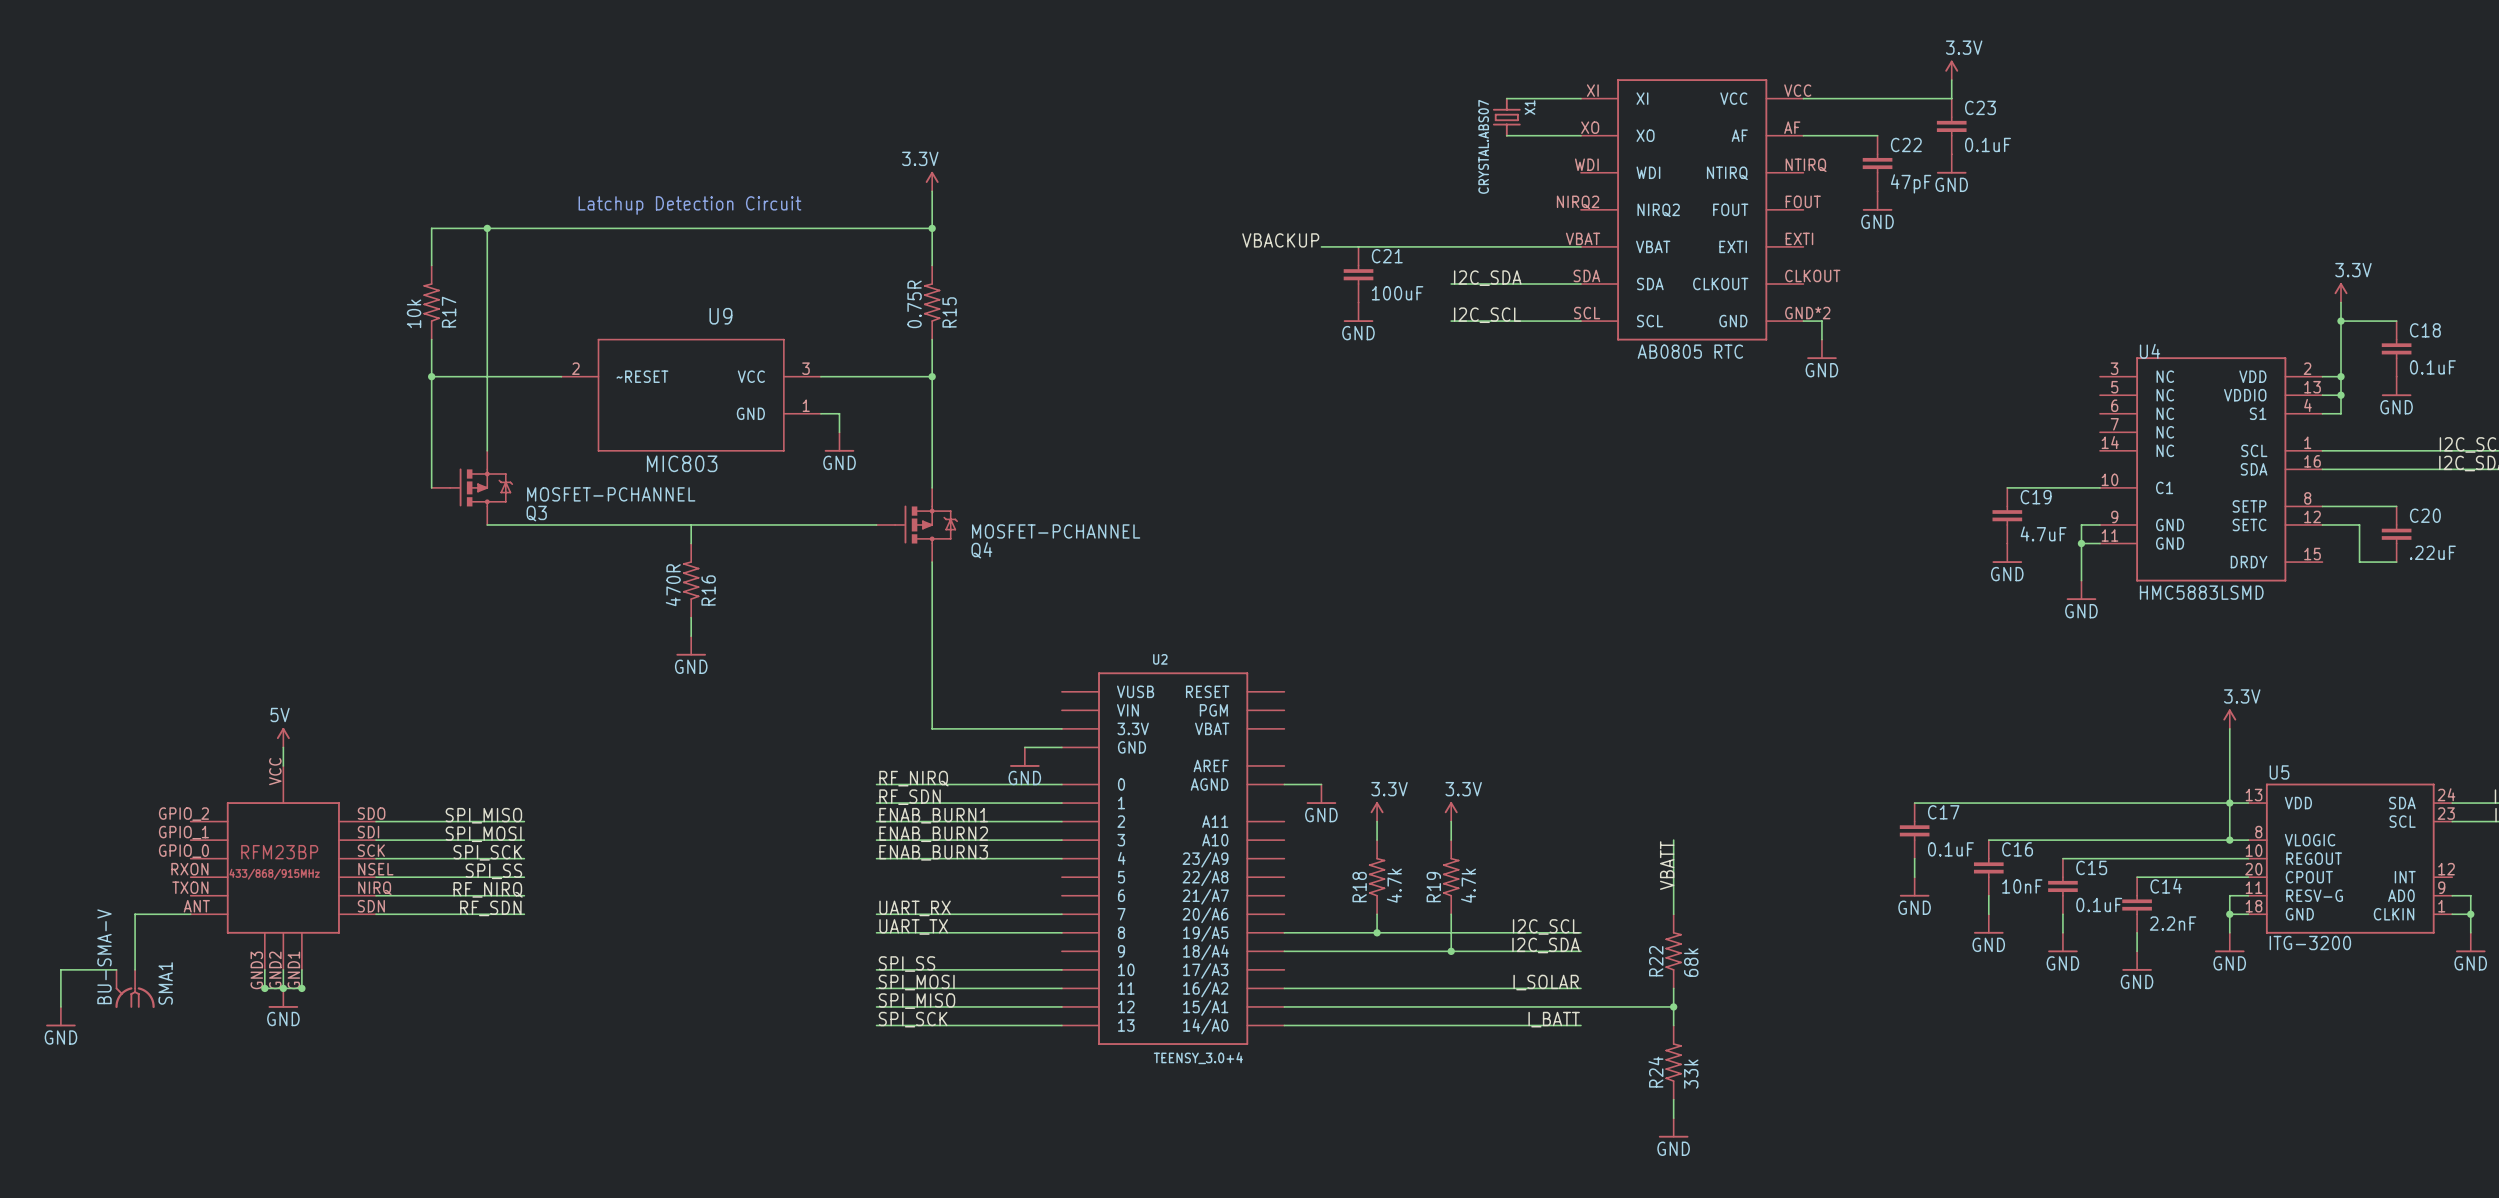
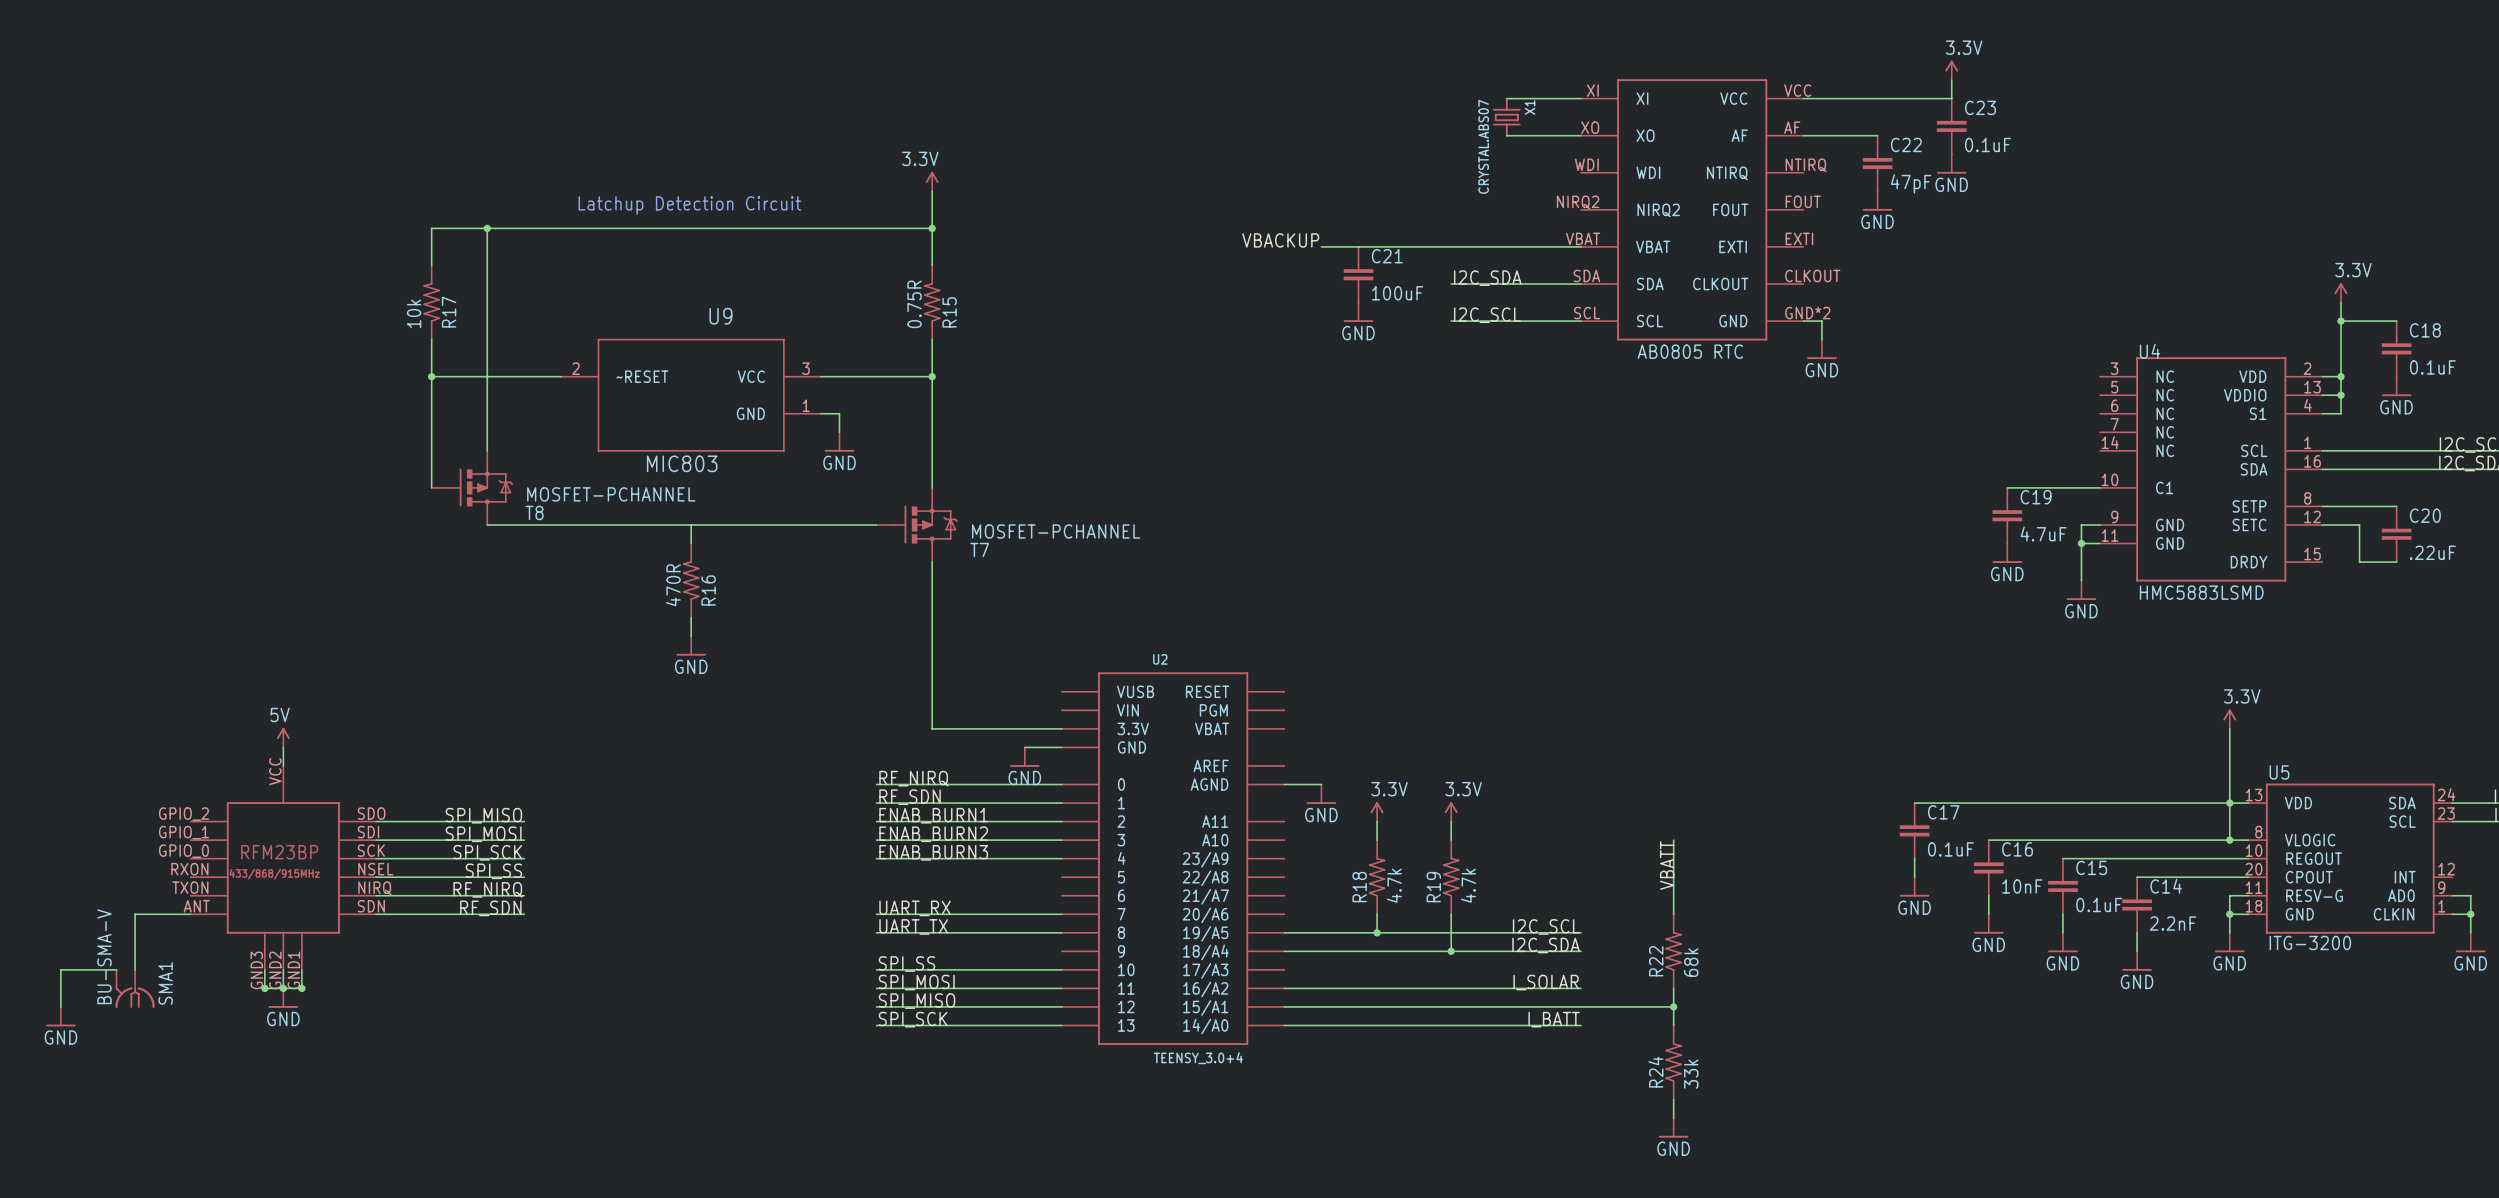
Q3 name: Q3 (536, 513) -> T8 (534, 512)
Q4 name: Q4 (981, 550) -> T7 (979, 550)

